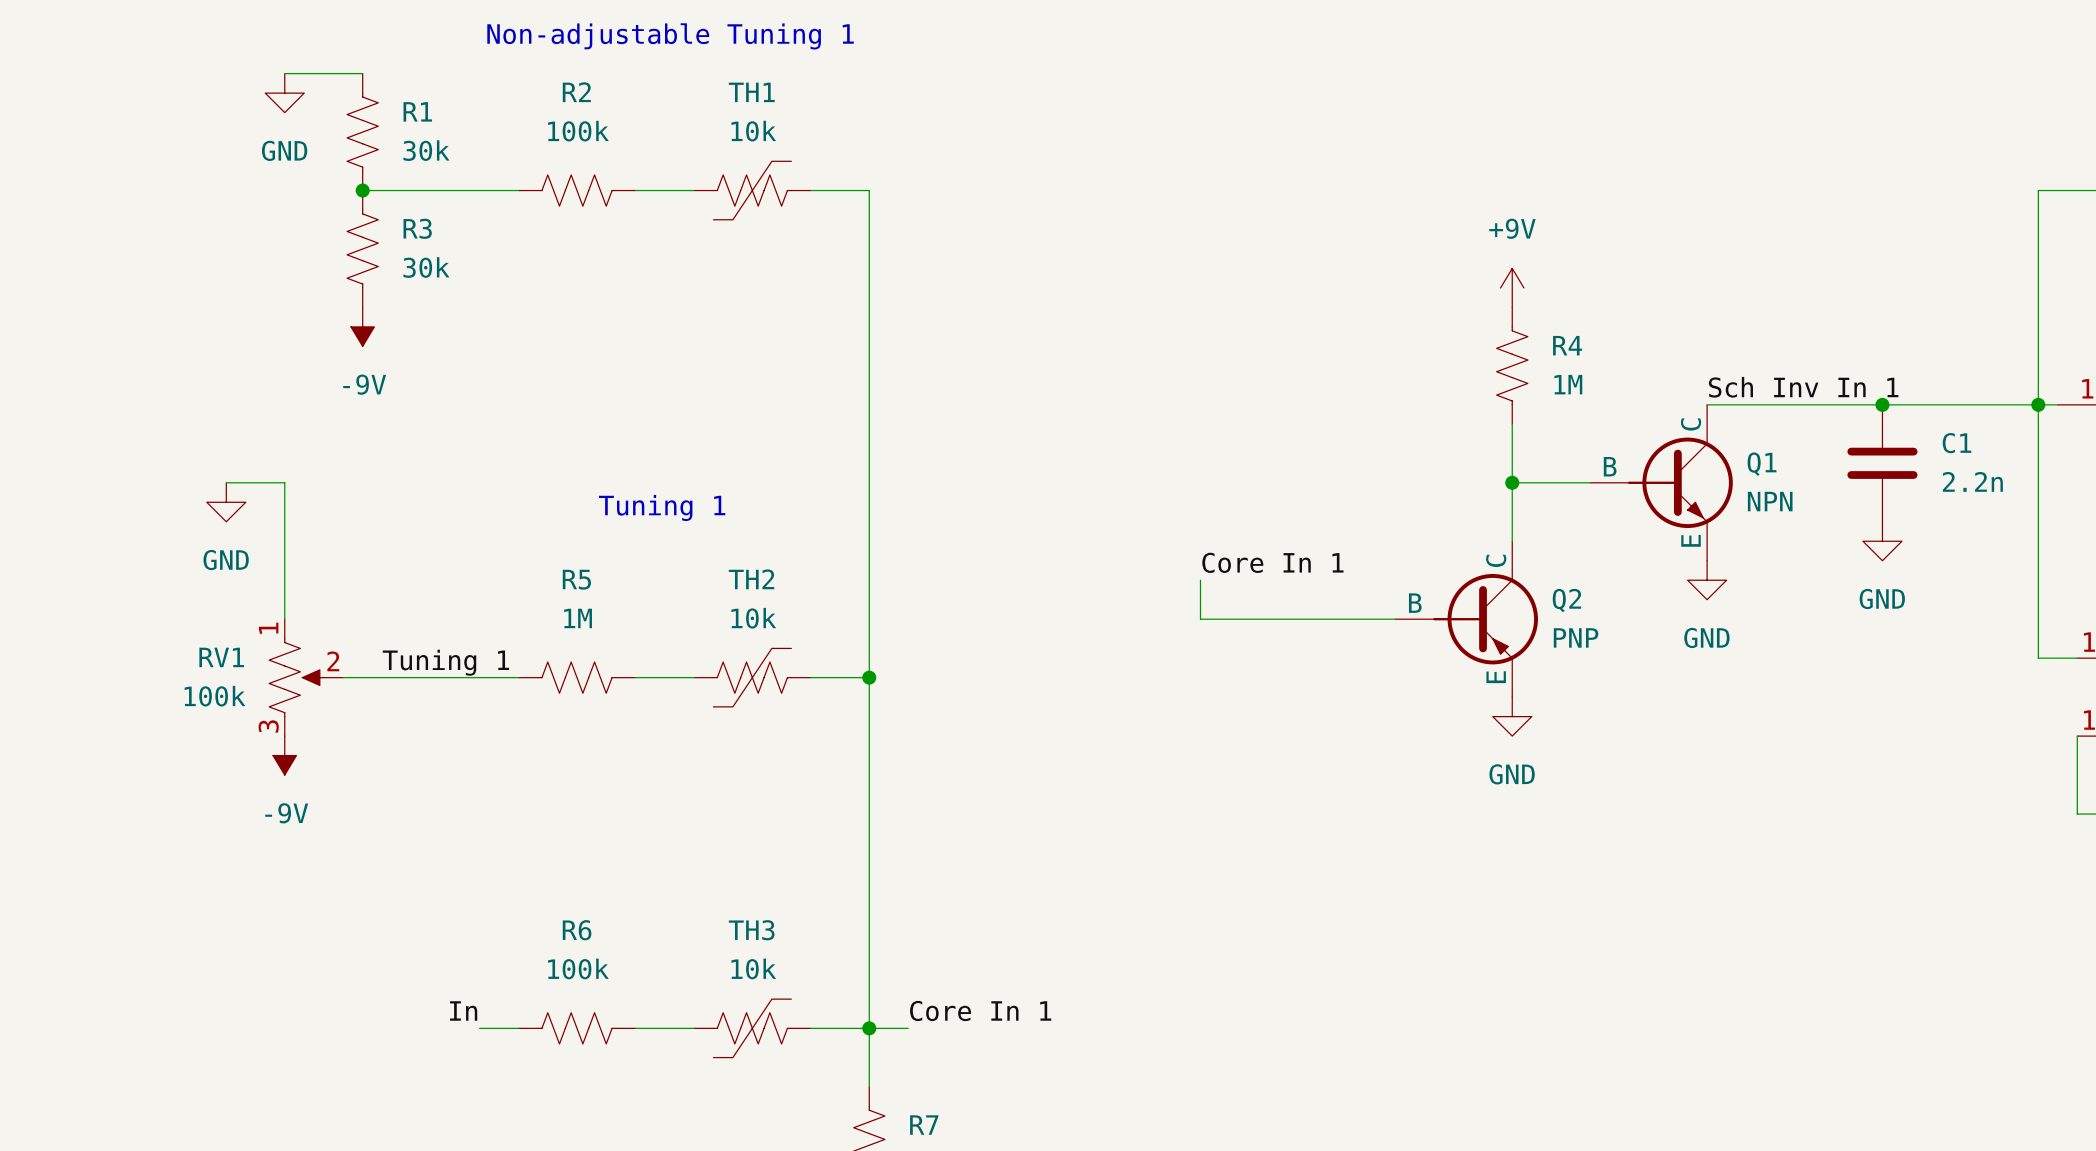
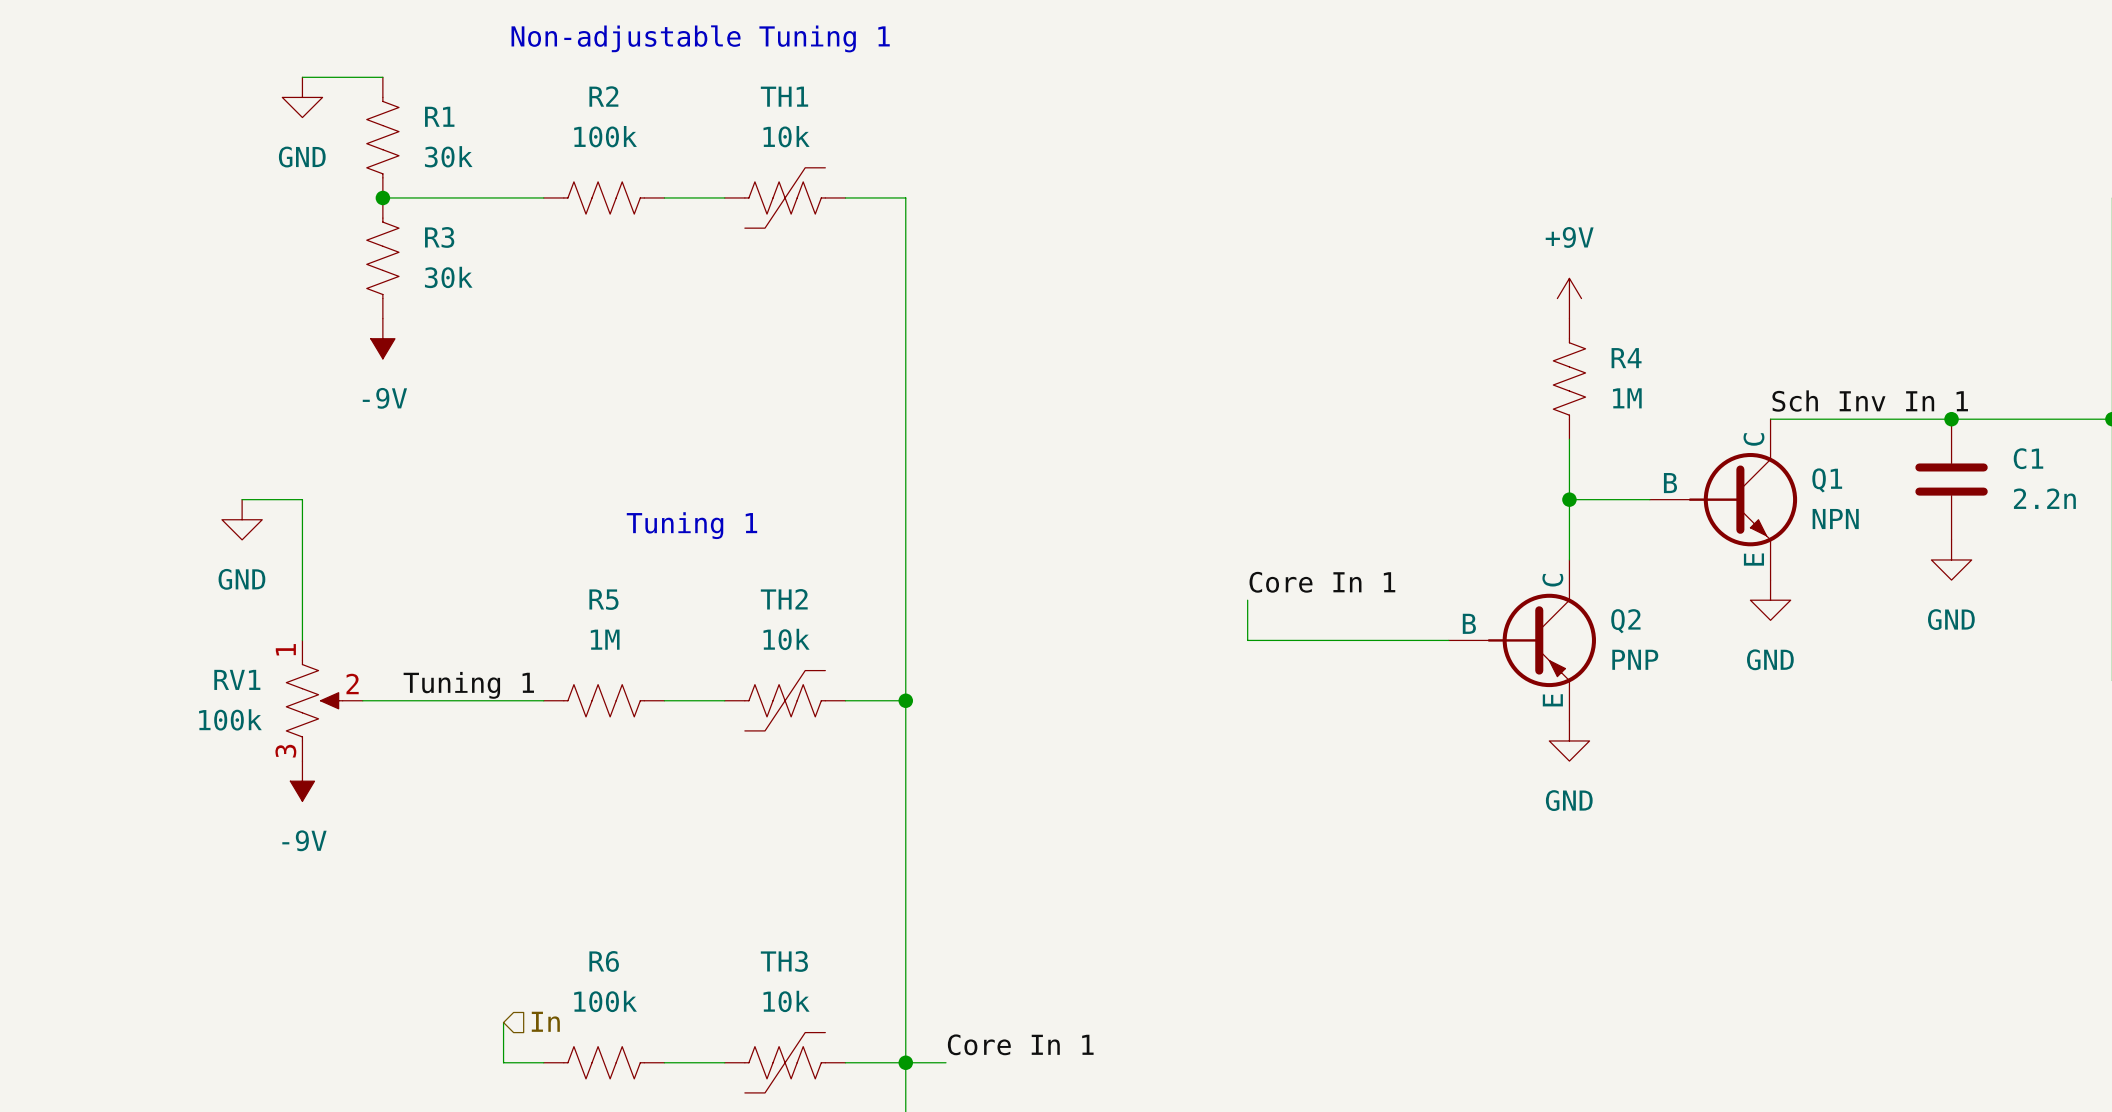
hierarchical label: none -> In (545, 1021)
wire: none -> (503, 1022) (503, 1062)
label: In (463, 1010) -> none

